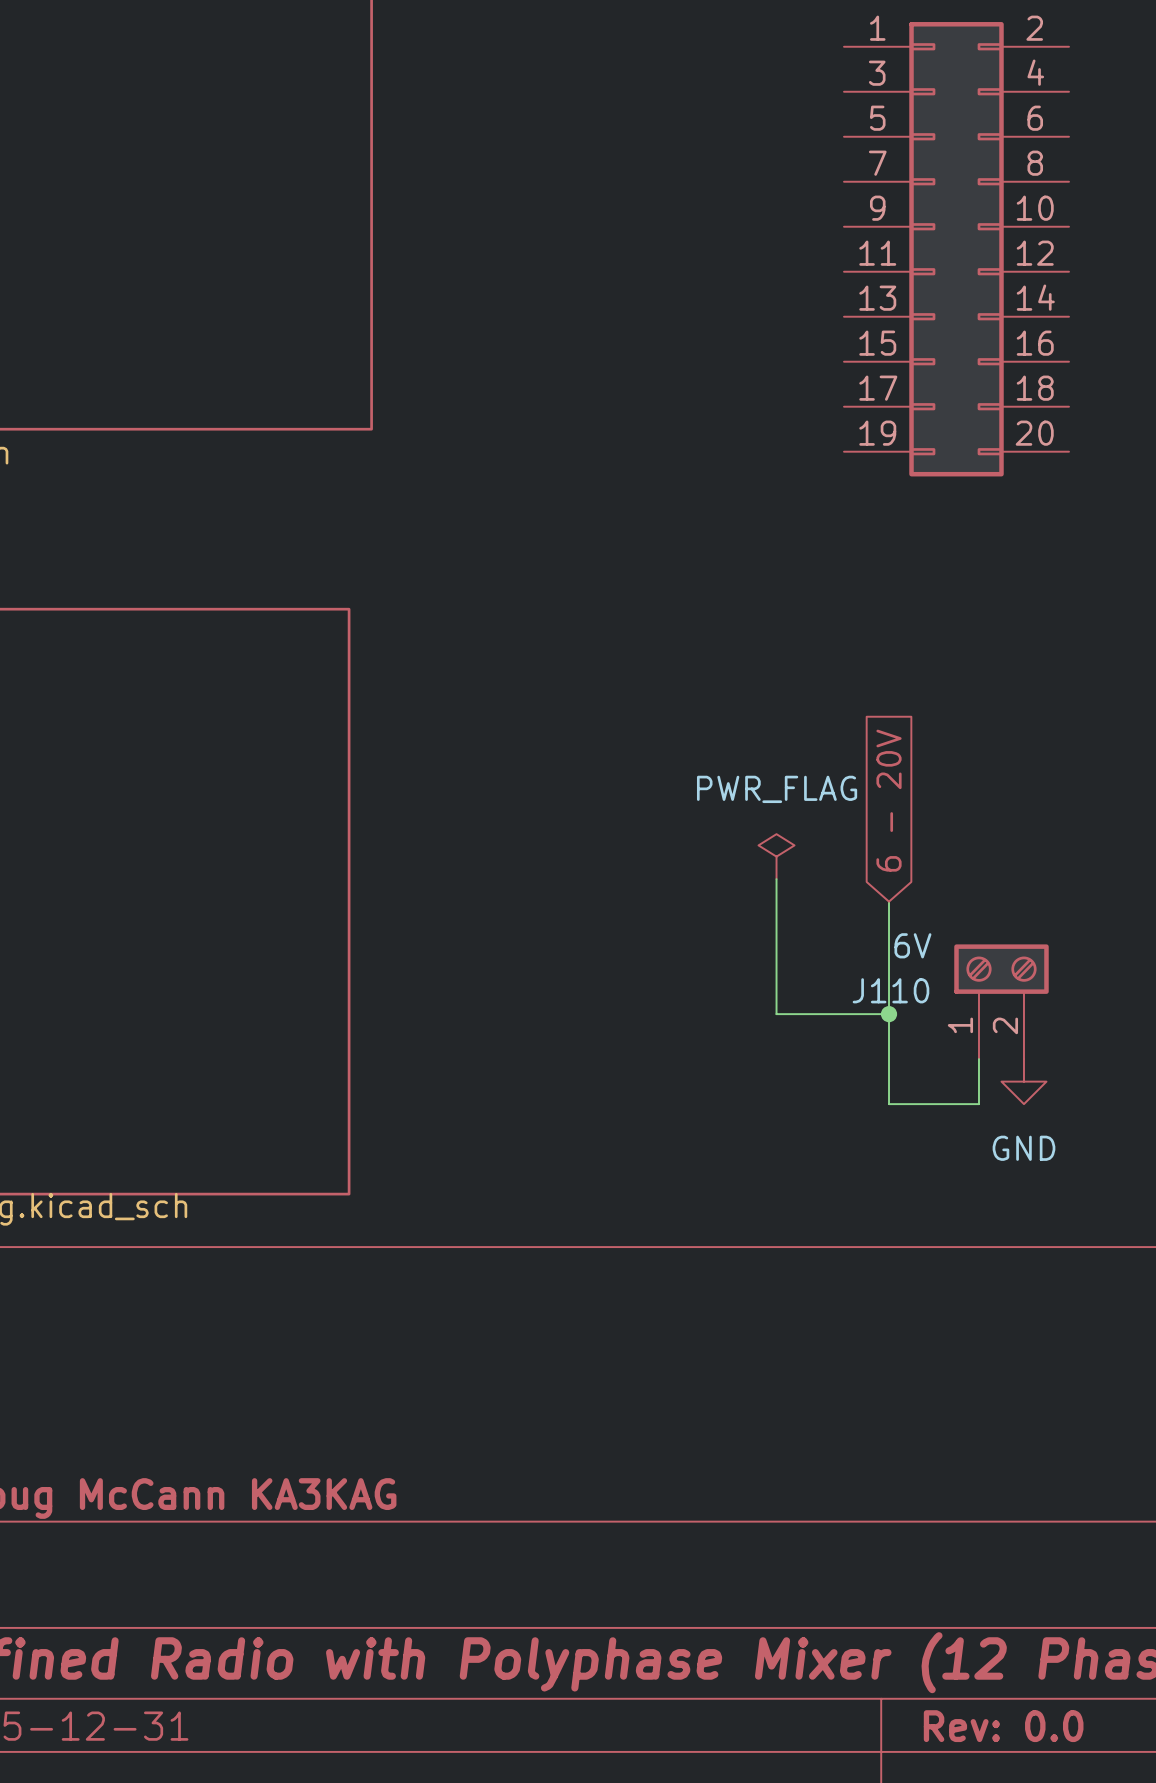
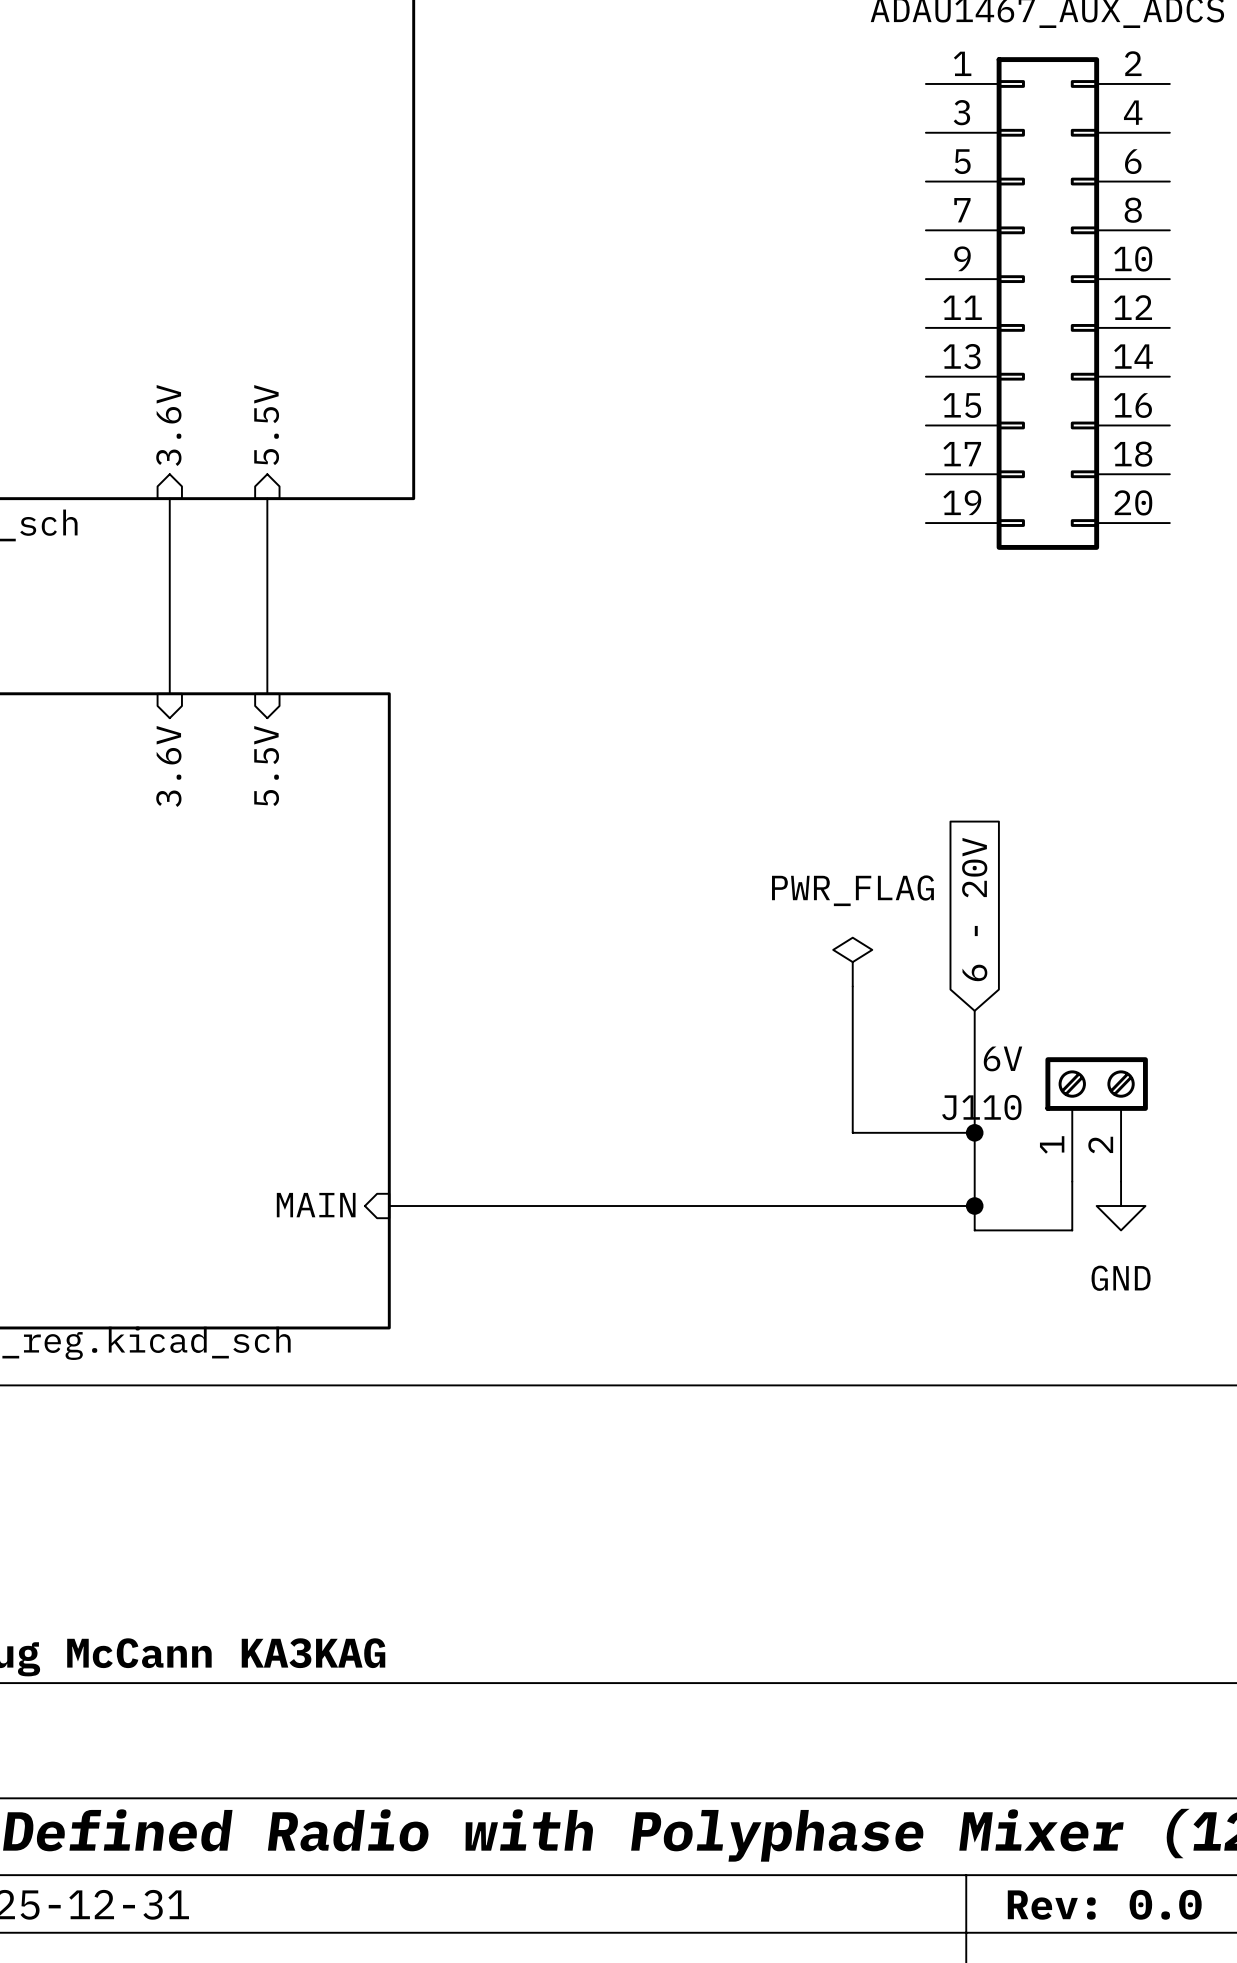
sheet pin: none -> 3.6V (168, 425)
sheet pin: none -> 5.5V (266, 425)
wire: none -> (169, 498) (169, 693)
wire: none -> (267, 498) (267, 693)
sheet pin: none -> 5.5V (266, 766)
sheet pin: none -> 3.6V (168, 766)
sheet pin: none -> MAIN (316, 1205)
wire: none -> (389, 1206) (974, 1206)
junction: none -> (974, 1206)

